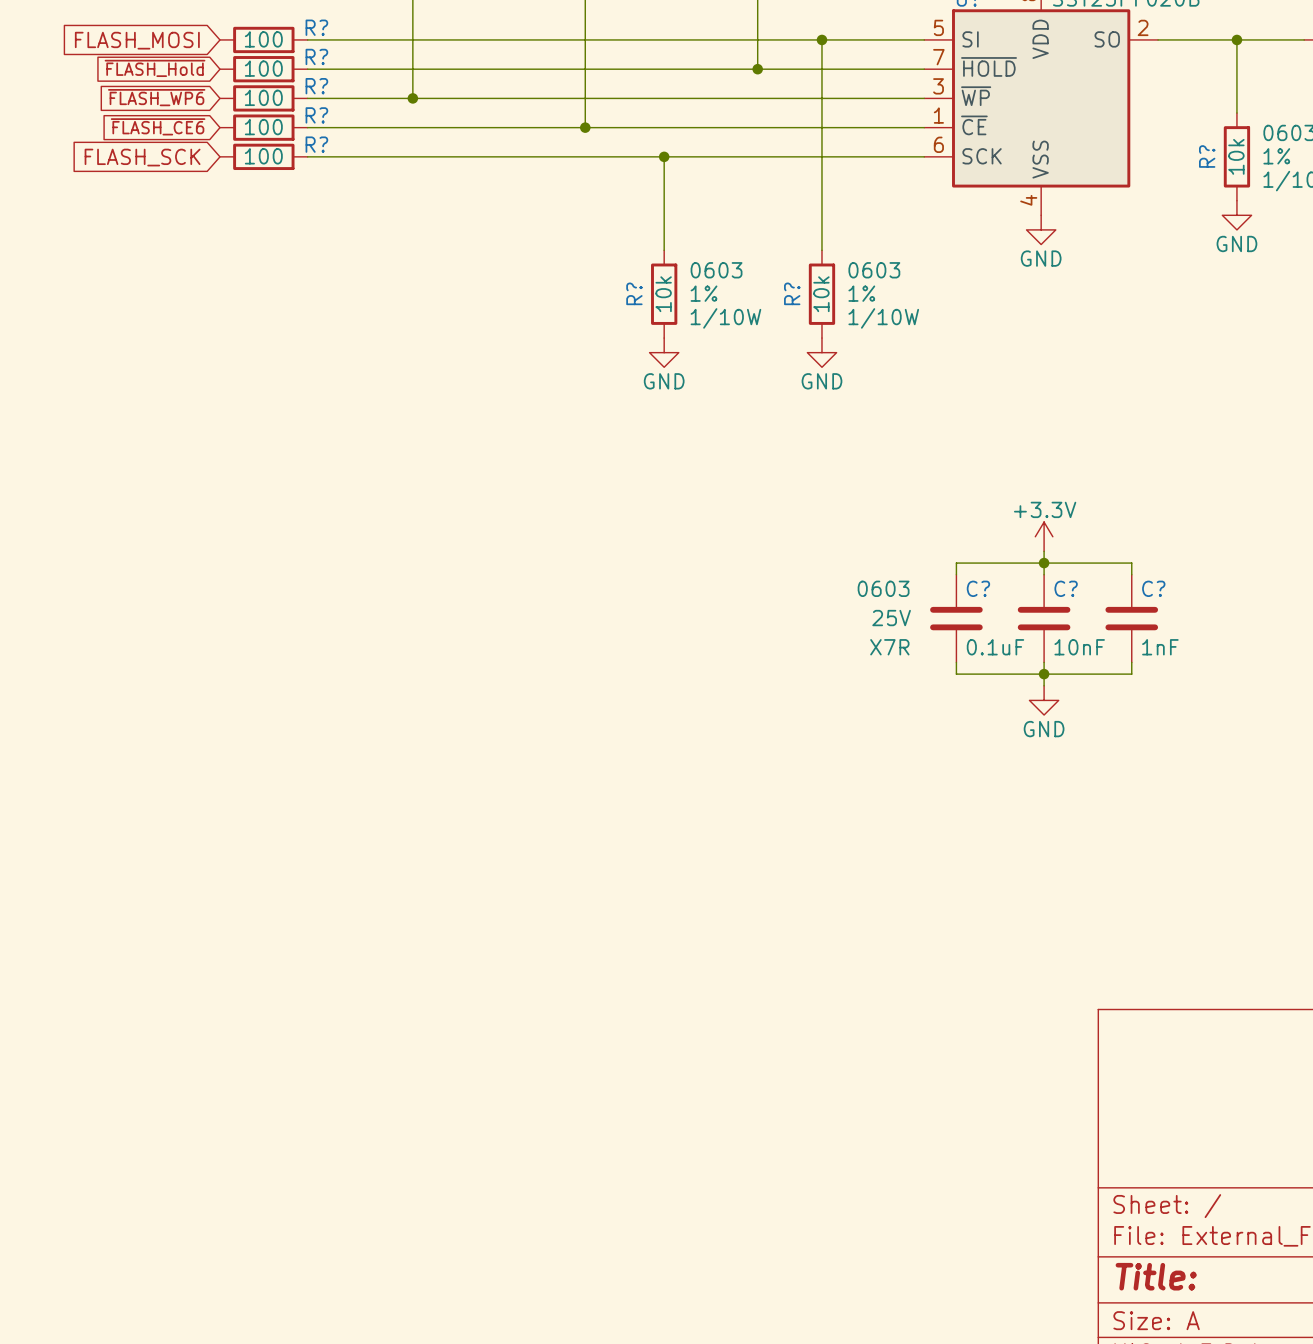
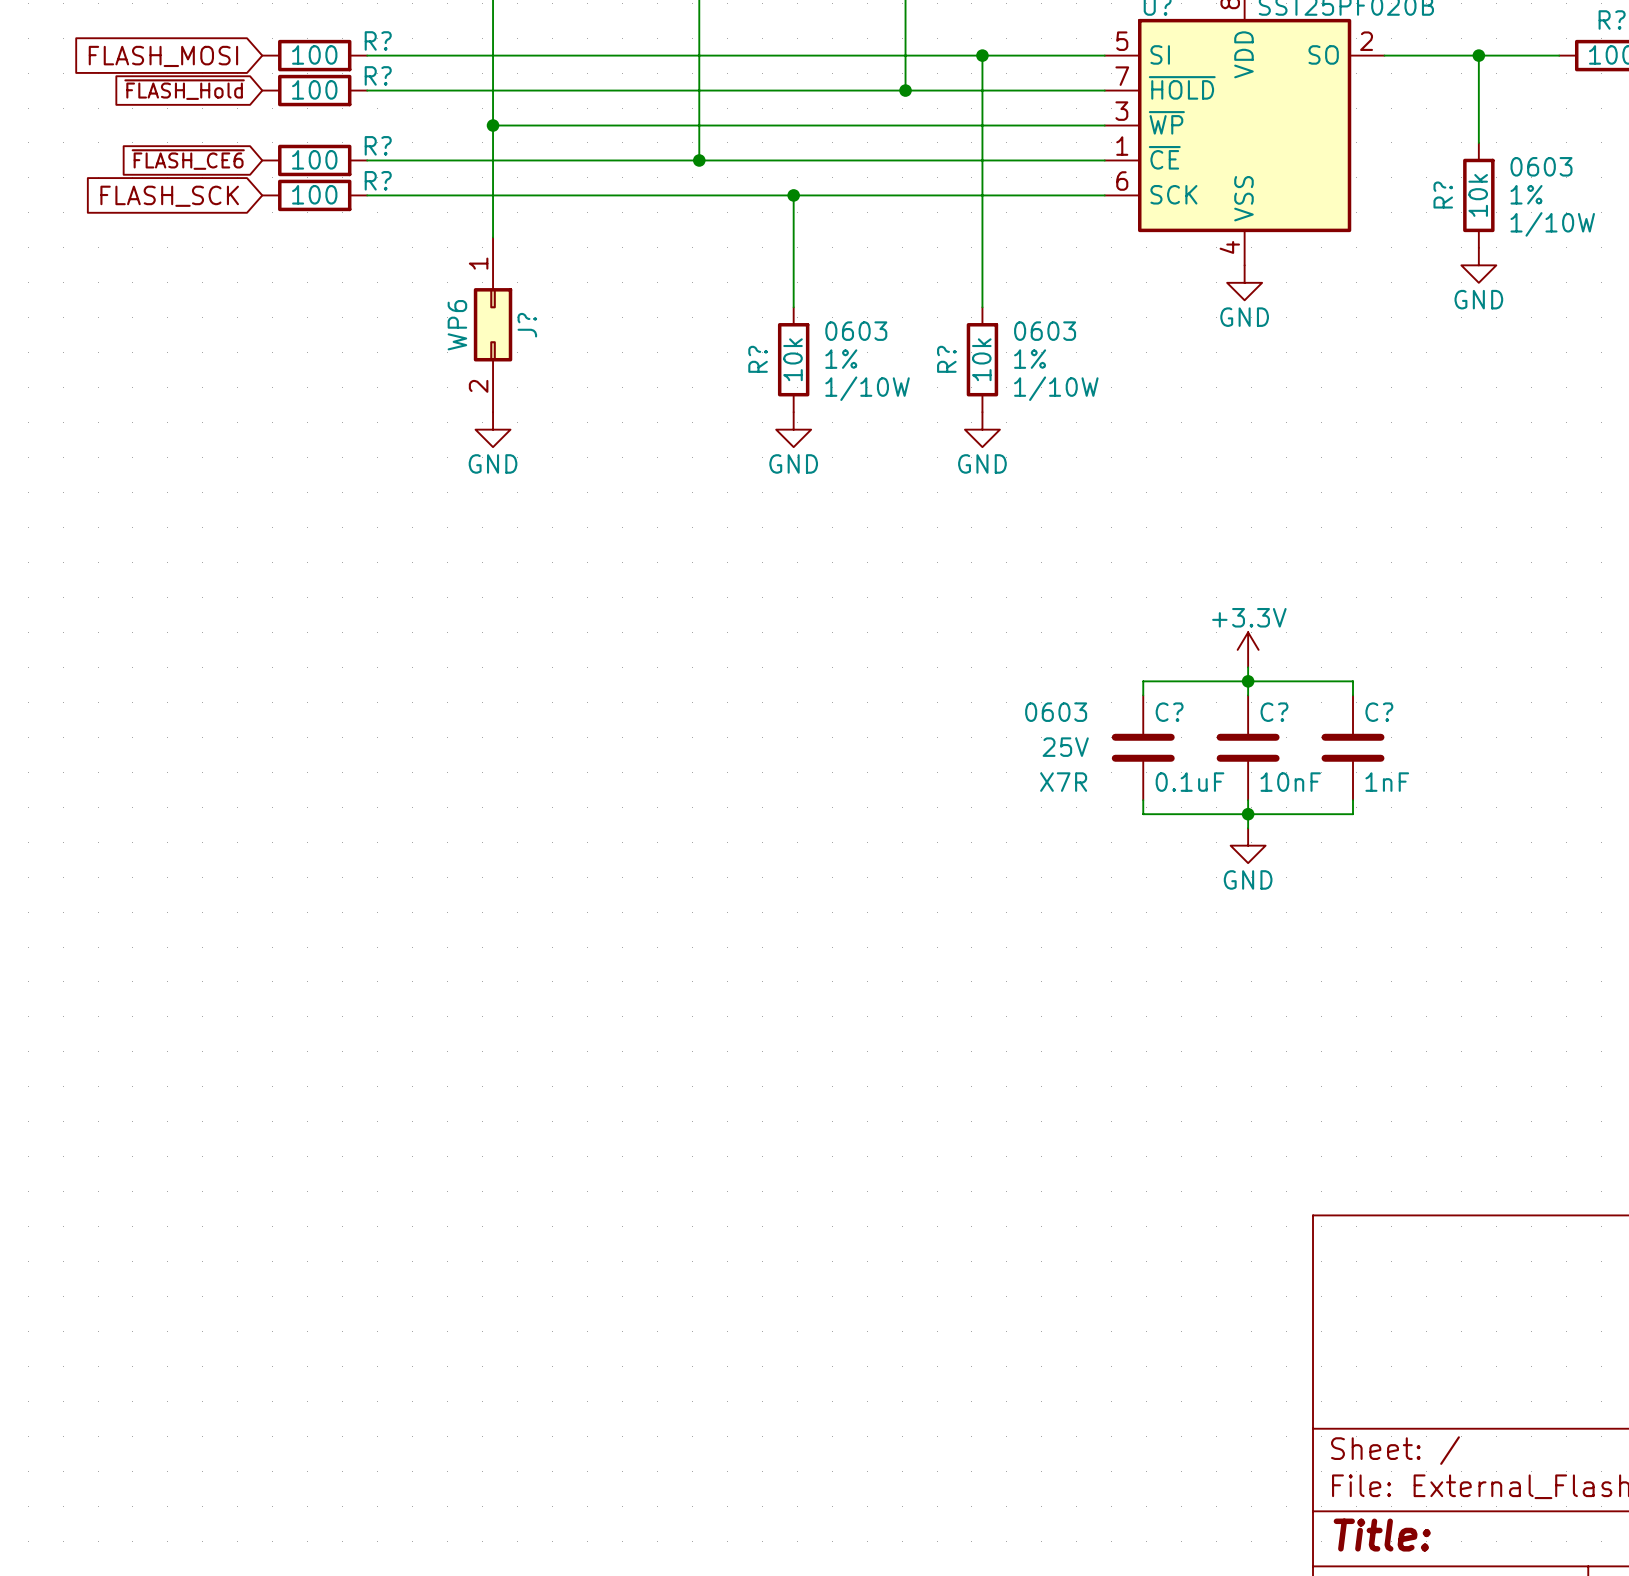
global label: ~{FLASH_WP6} (156, 97) -> none
R?: 100 (263, 98) -> none
wire: (307, 98) (412, 98) -> (493, 237) (493, 125)
J?: none -> WP6 (493, 324)
power symbol: none -> GND (493, 429)

